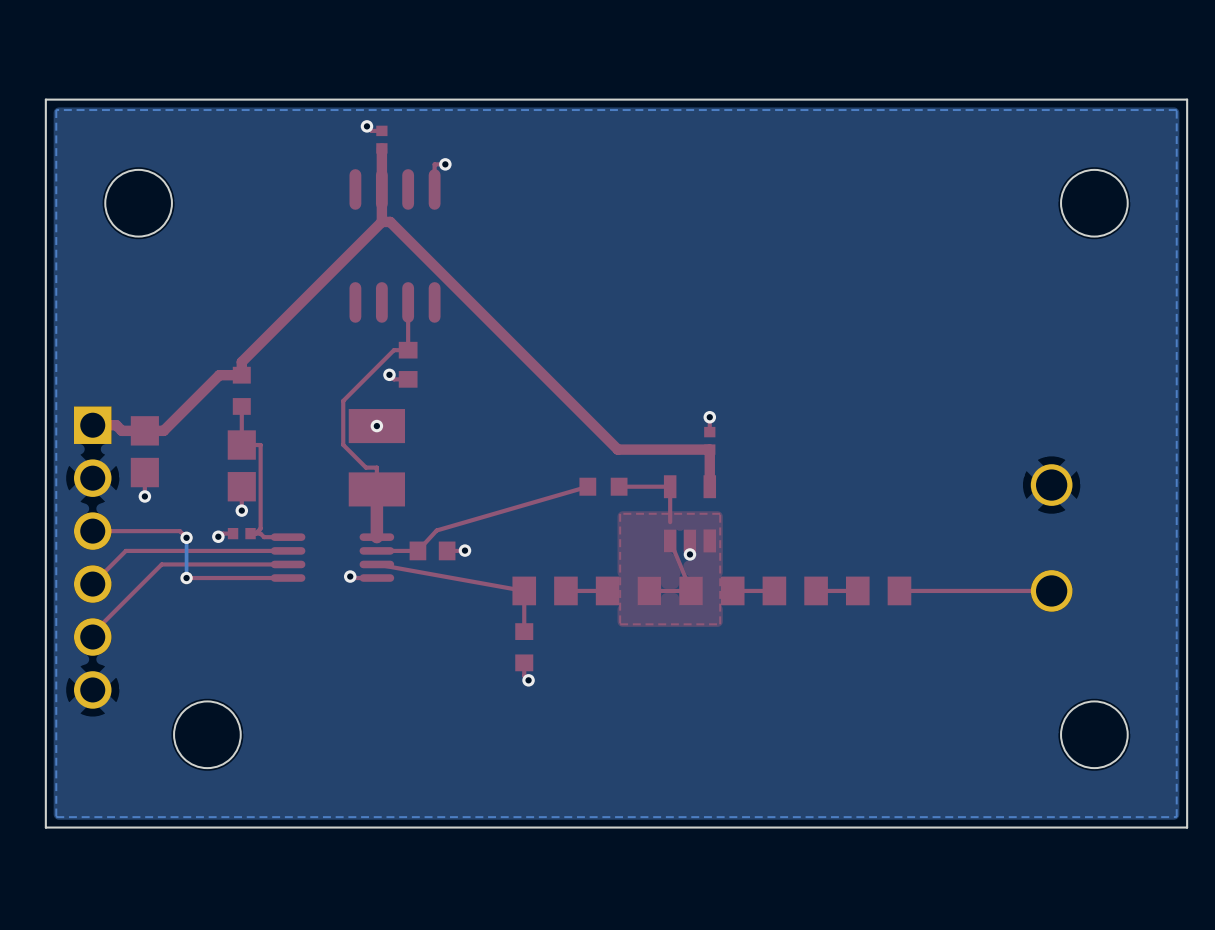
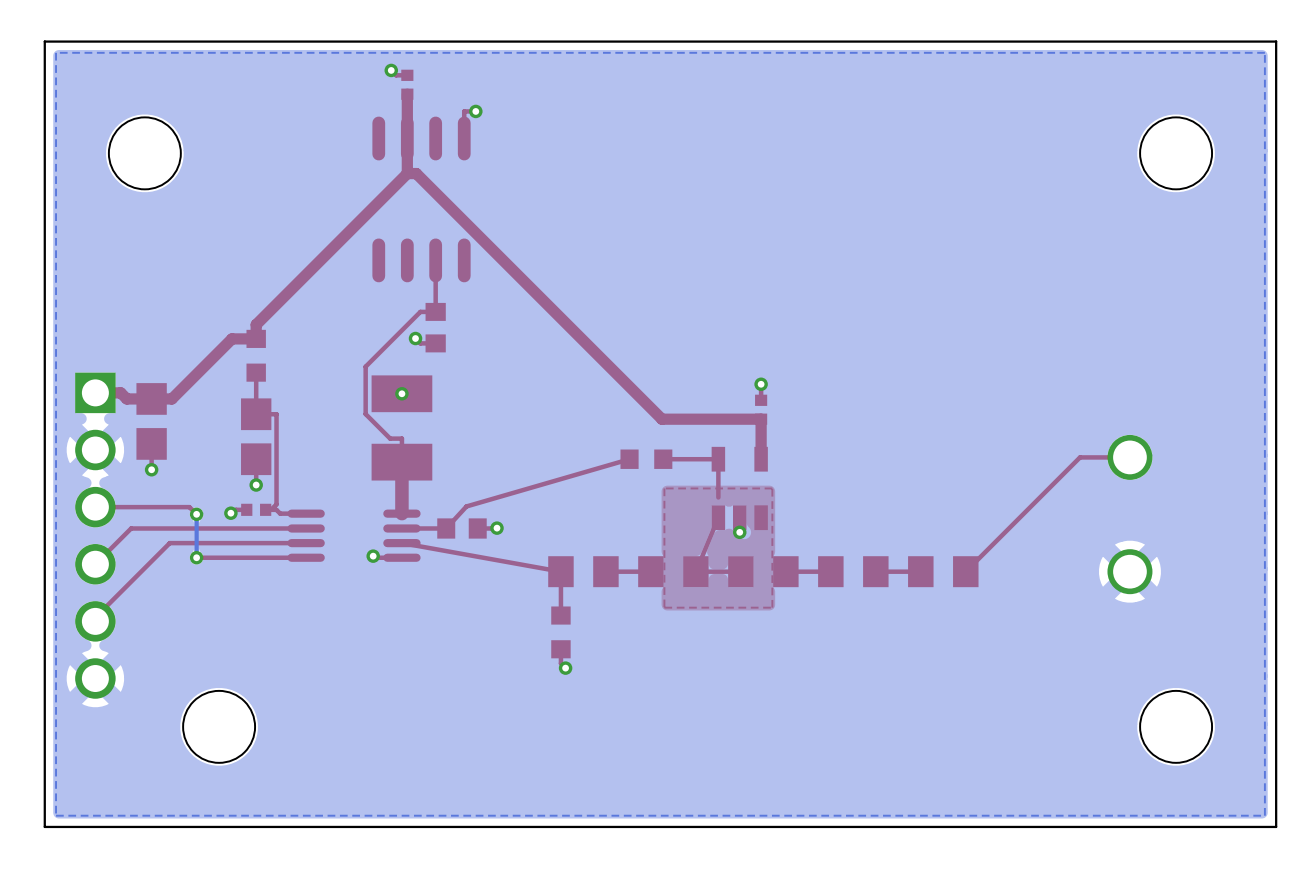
top track: (670, 540) (691, 590) -> (718, 517) (695, 571)
top track: (1051, 590) (899, 590) -> (1129, 457) (1080, 457) (965, 571)

